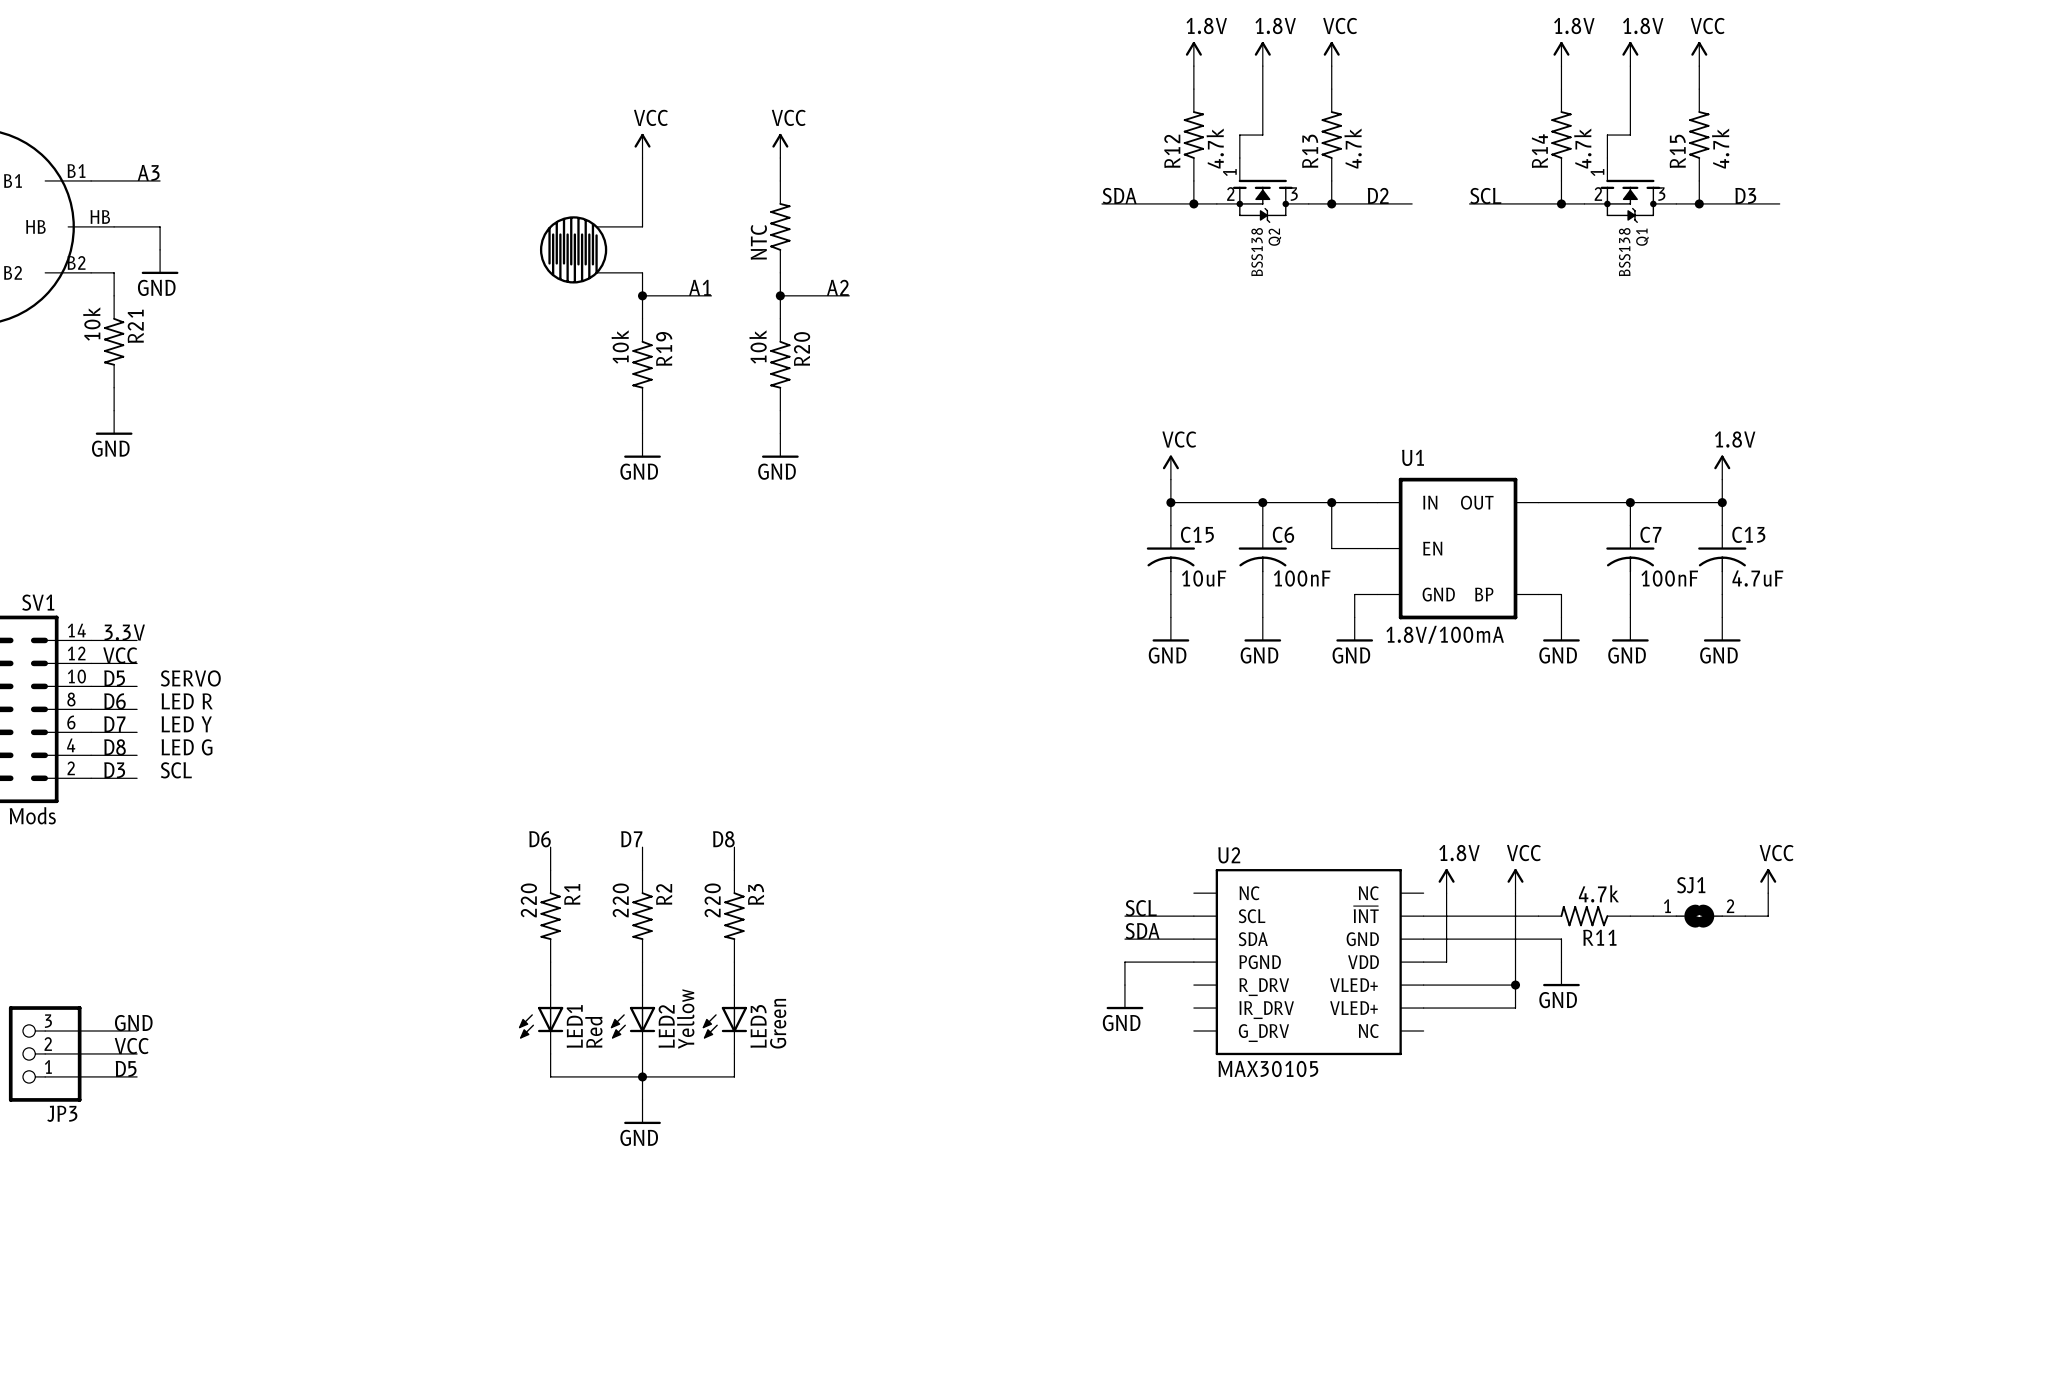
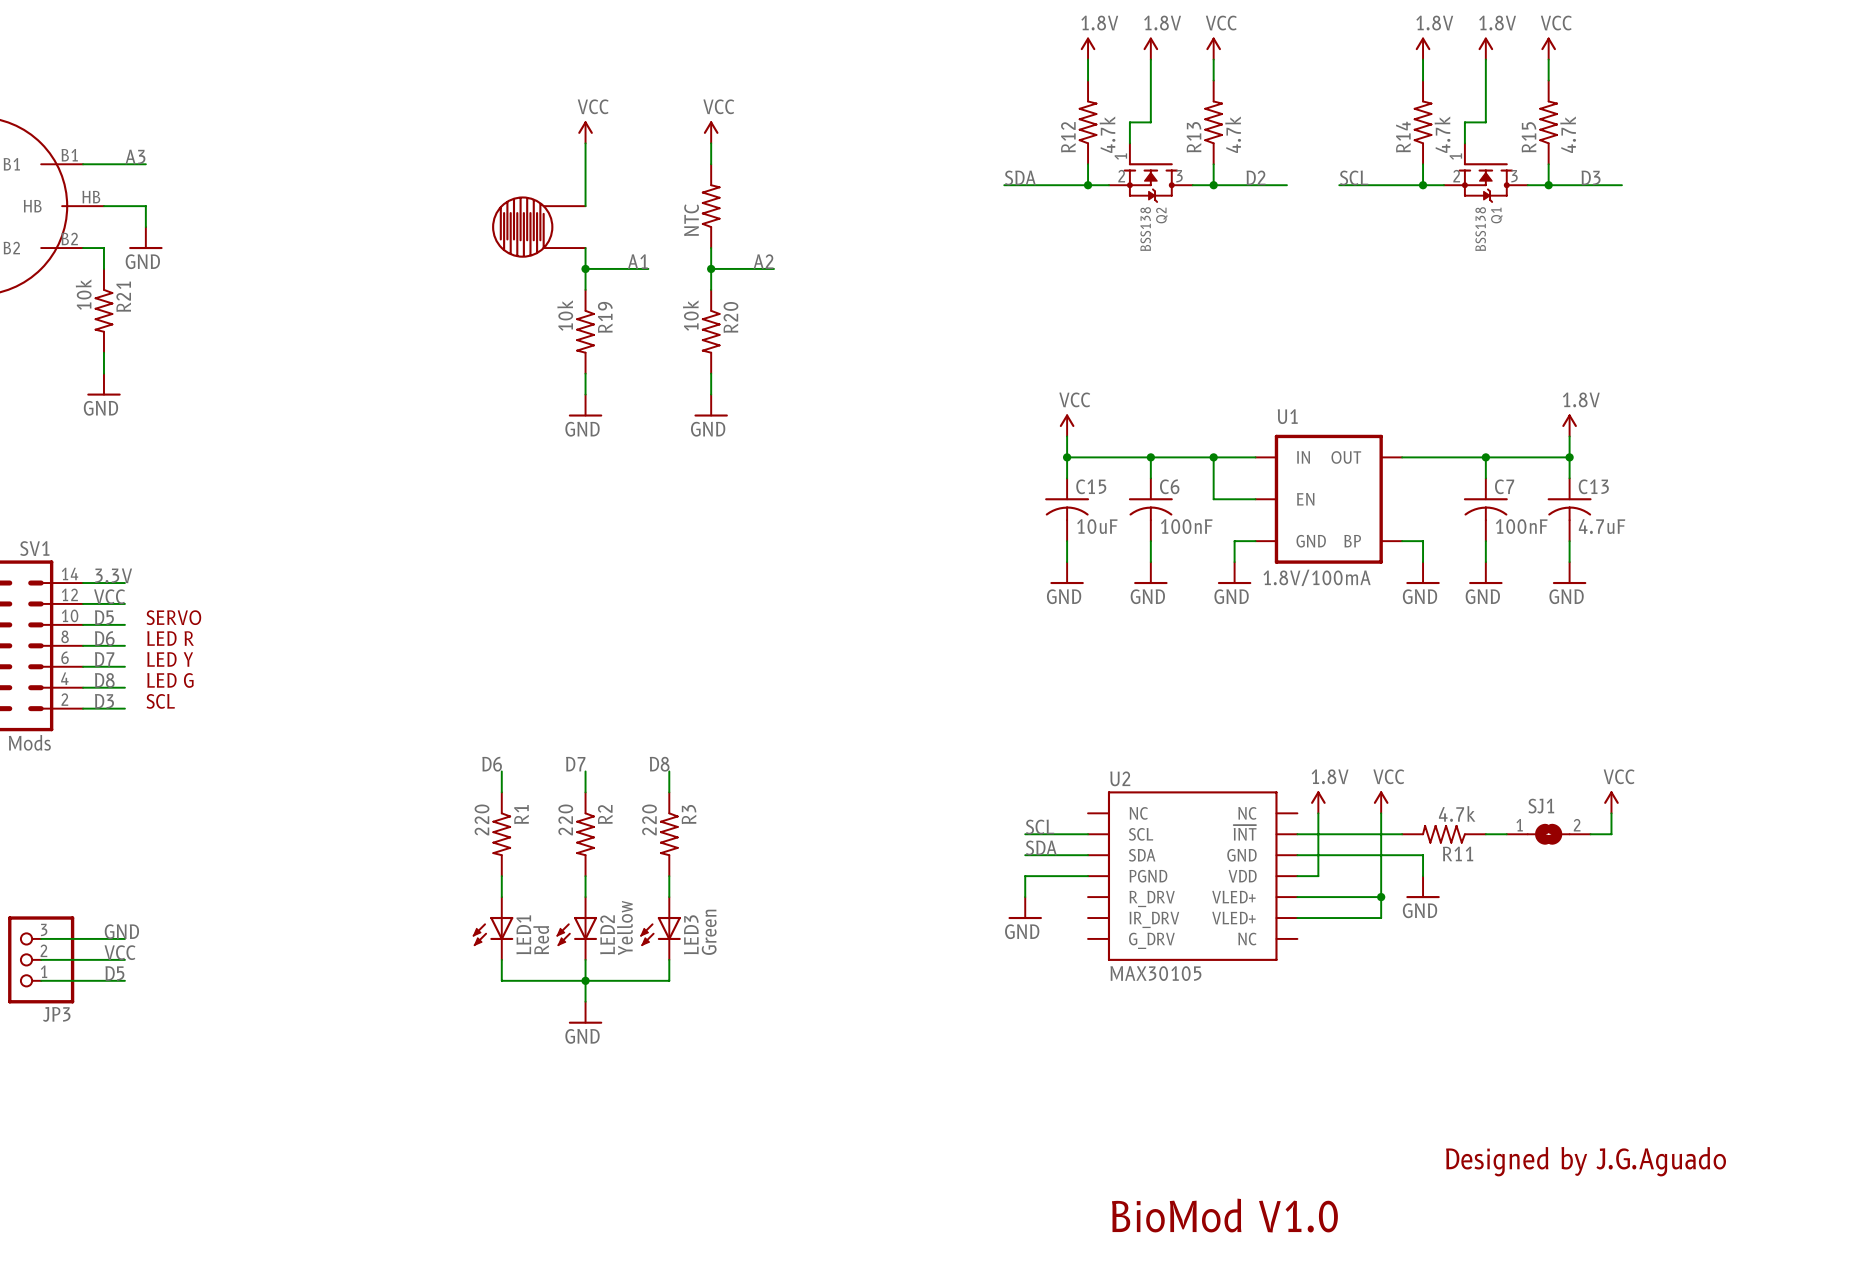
text: none -> Designed by J.G.Aguado (1586, 1161)
text: none -> BioMod V1.0 (1224, 1215)

